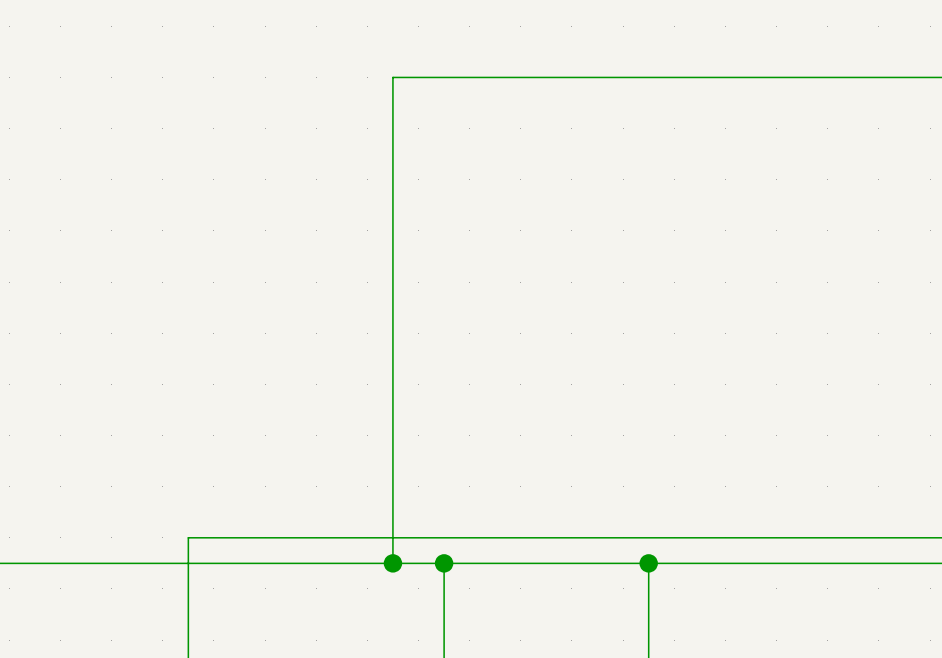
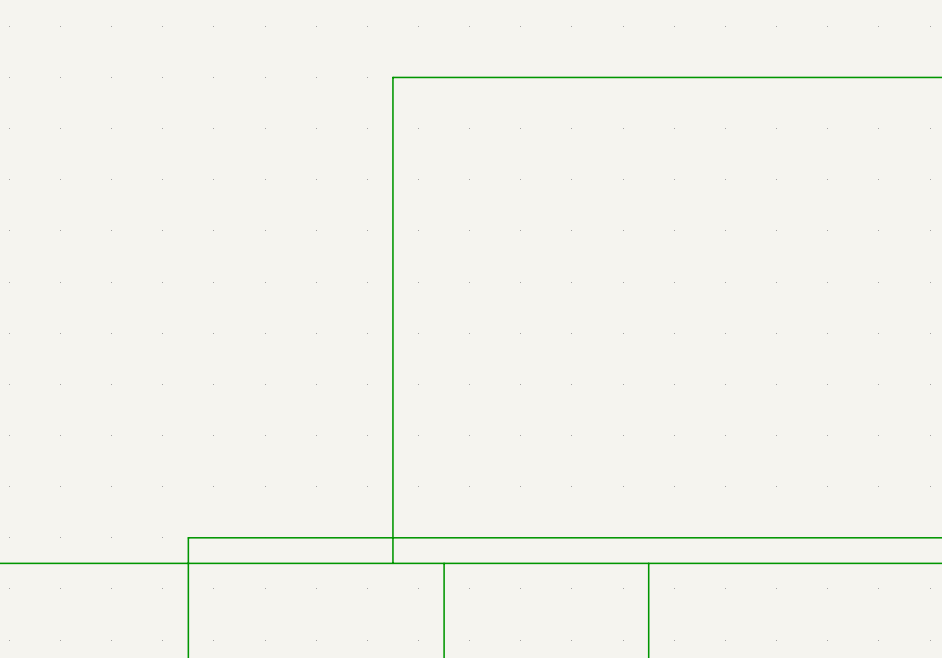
junction: (392, 563) -> none
junction: (444, 563) -> none
junction: (648, 563) -> none

